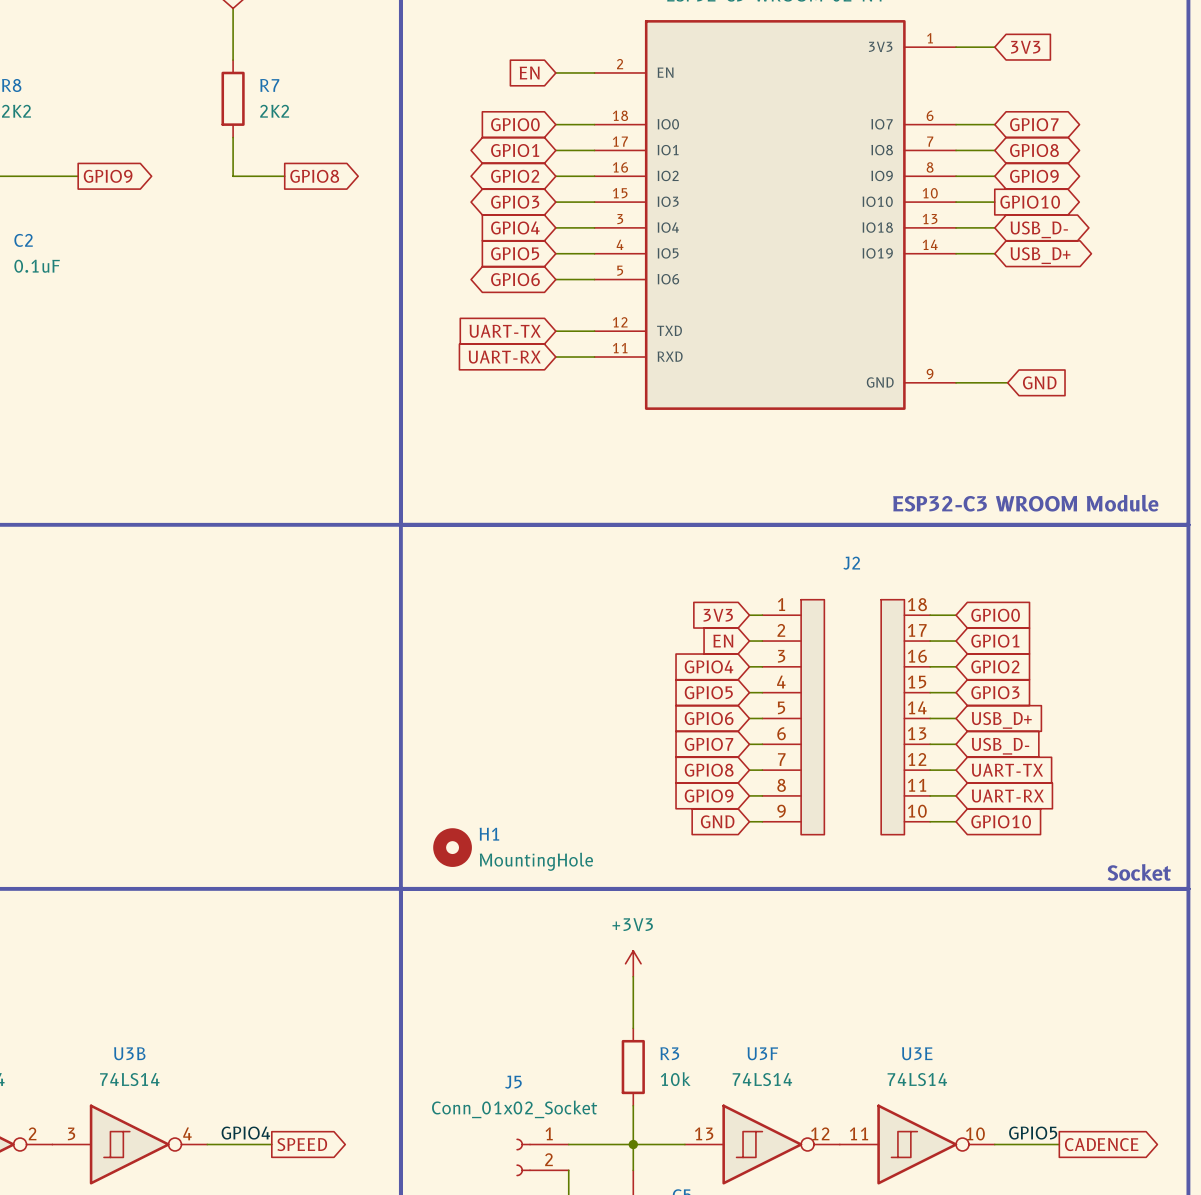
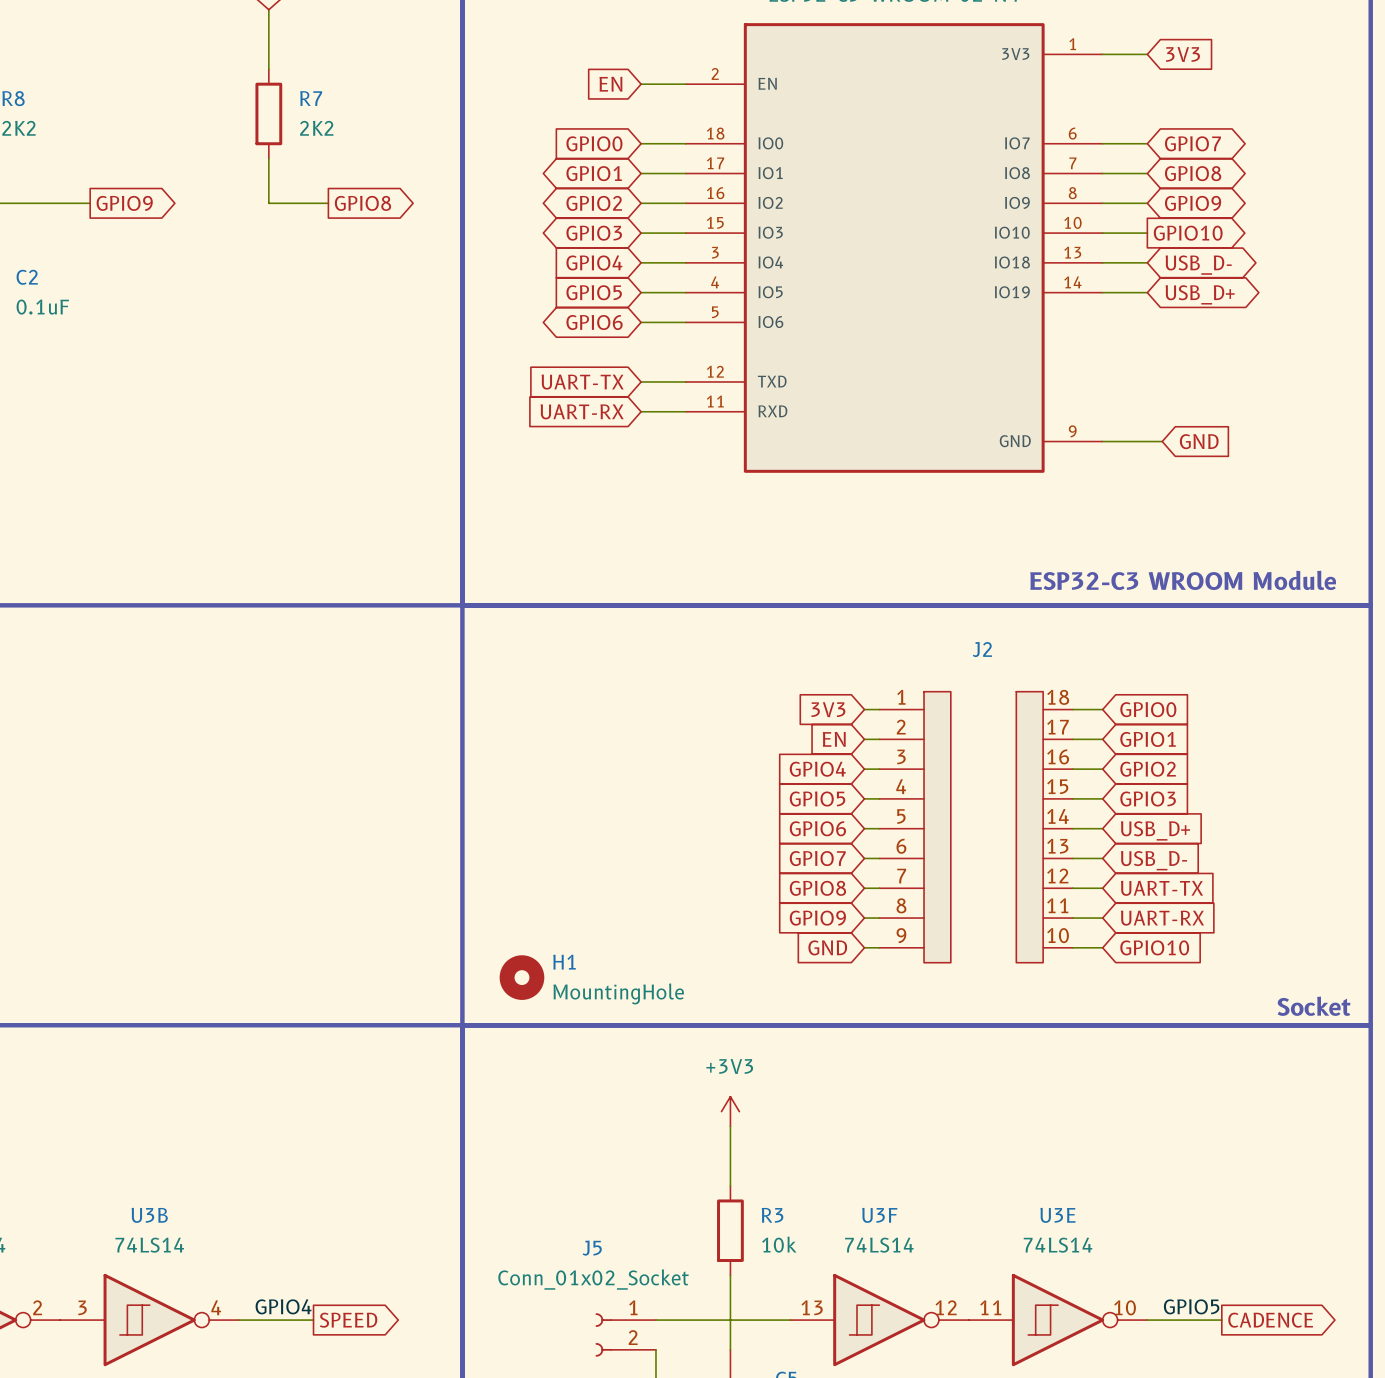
junction: (633, 1144) -> none

